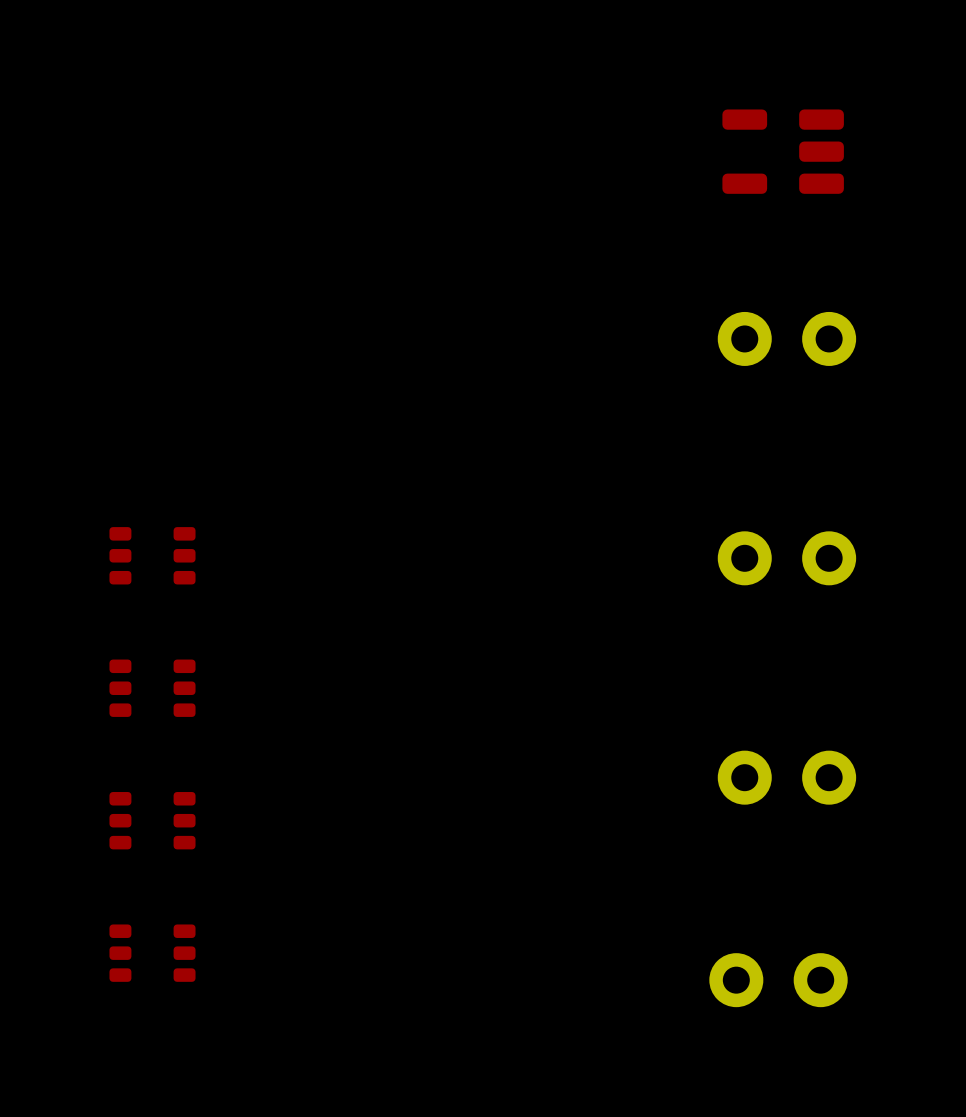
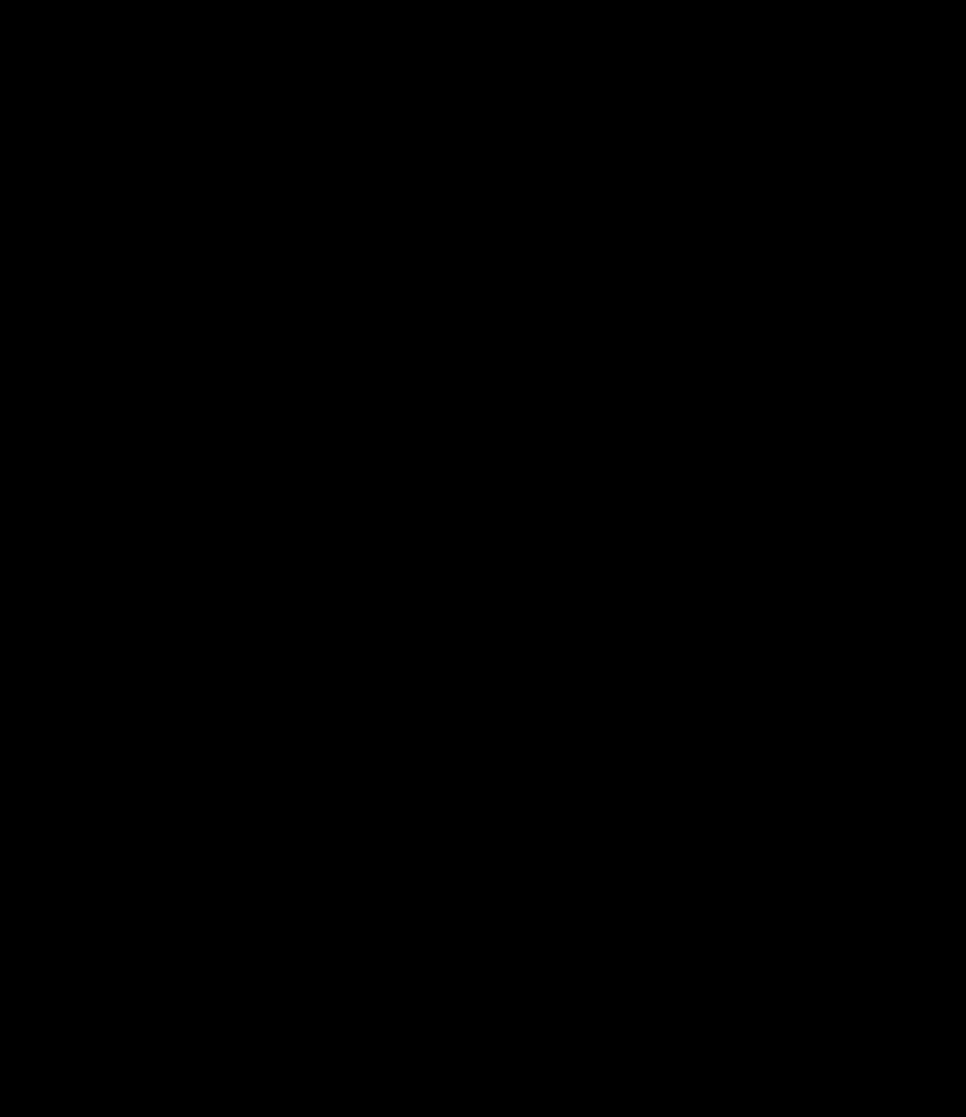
part: (783, 151) -> none
part: (786, 338) -> none
part: (152, 555) -> none
part: (786, 558) -> none
part: (152, 688) -> none
part: (786, 777) -> none
part: (152, 820) -> none
part: (152, 953) -> none
part: (778, 980) -> none

